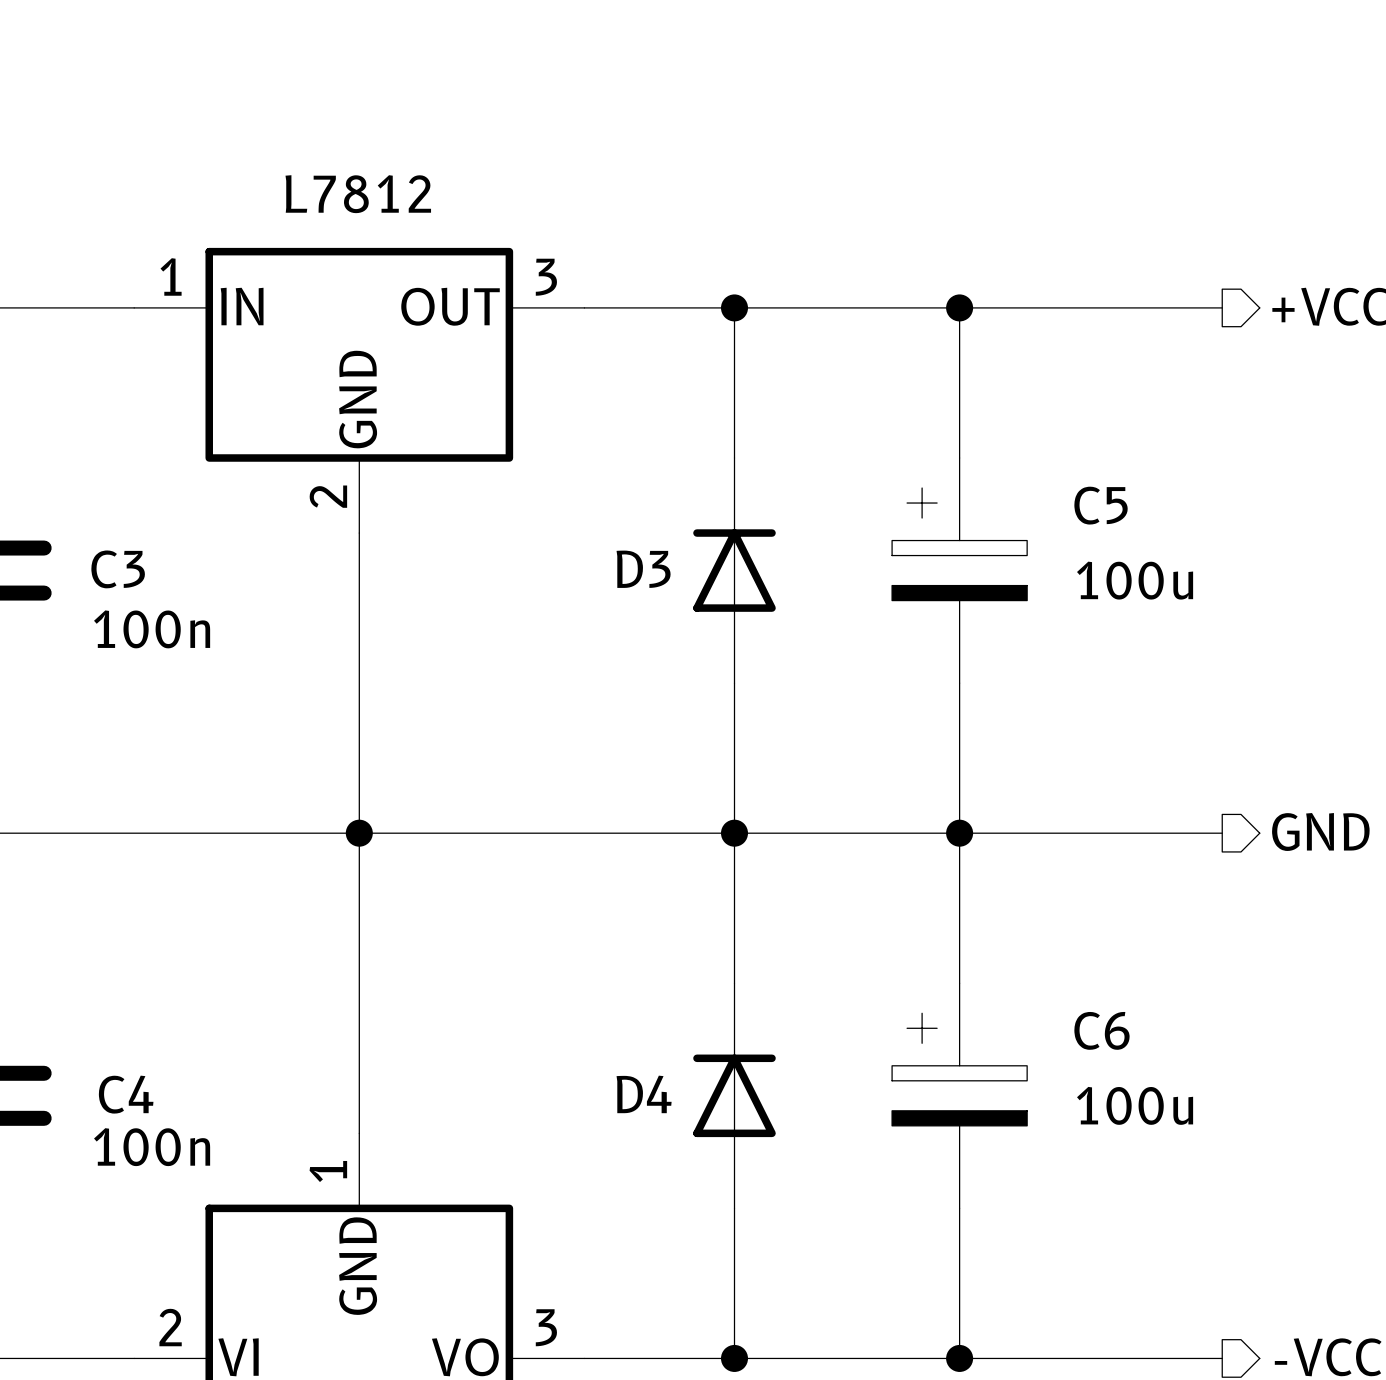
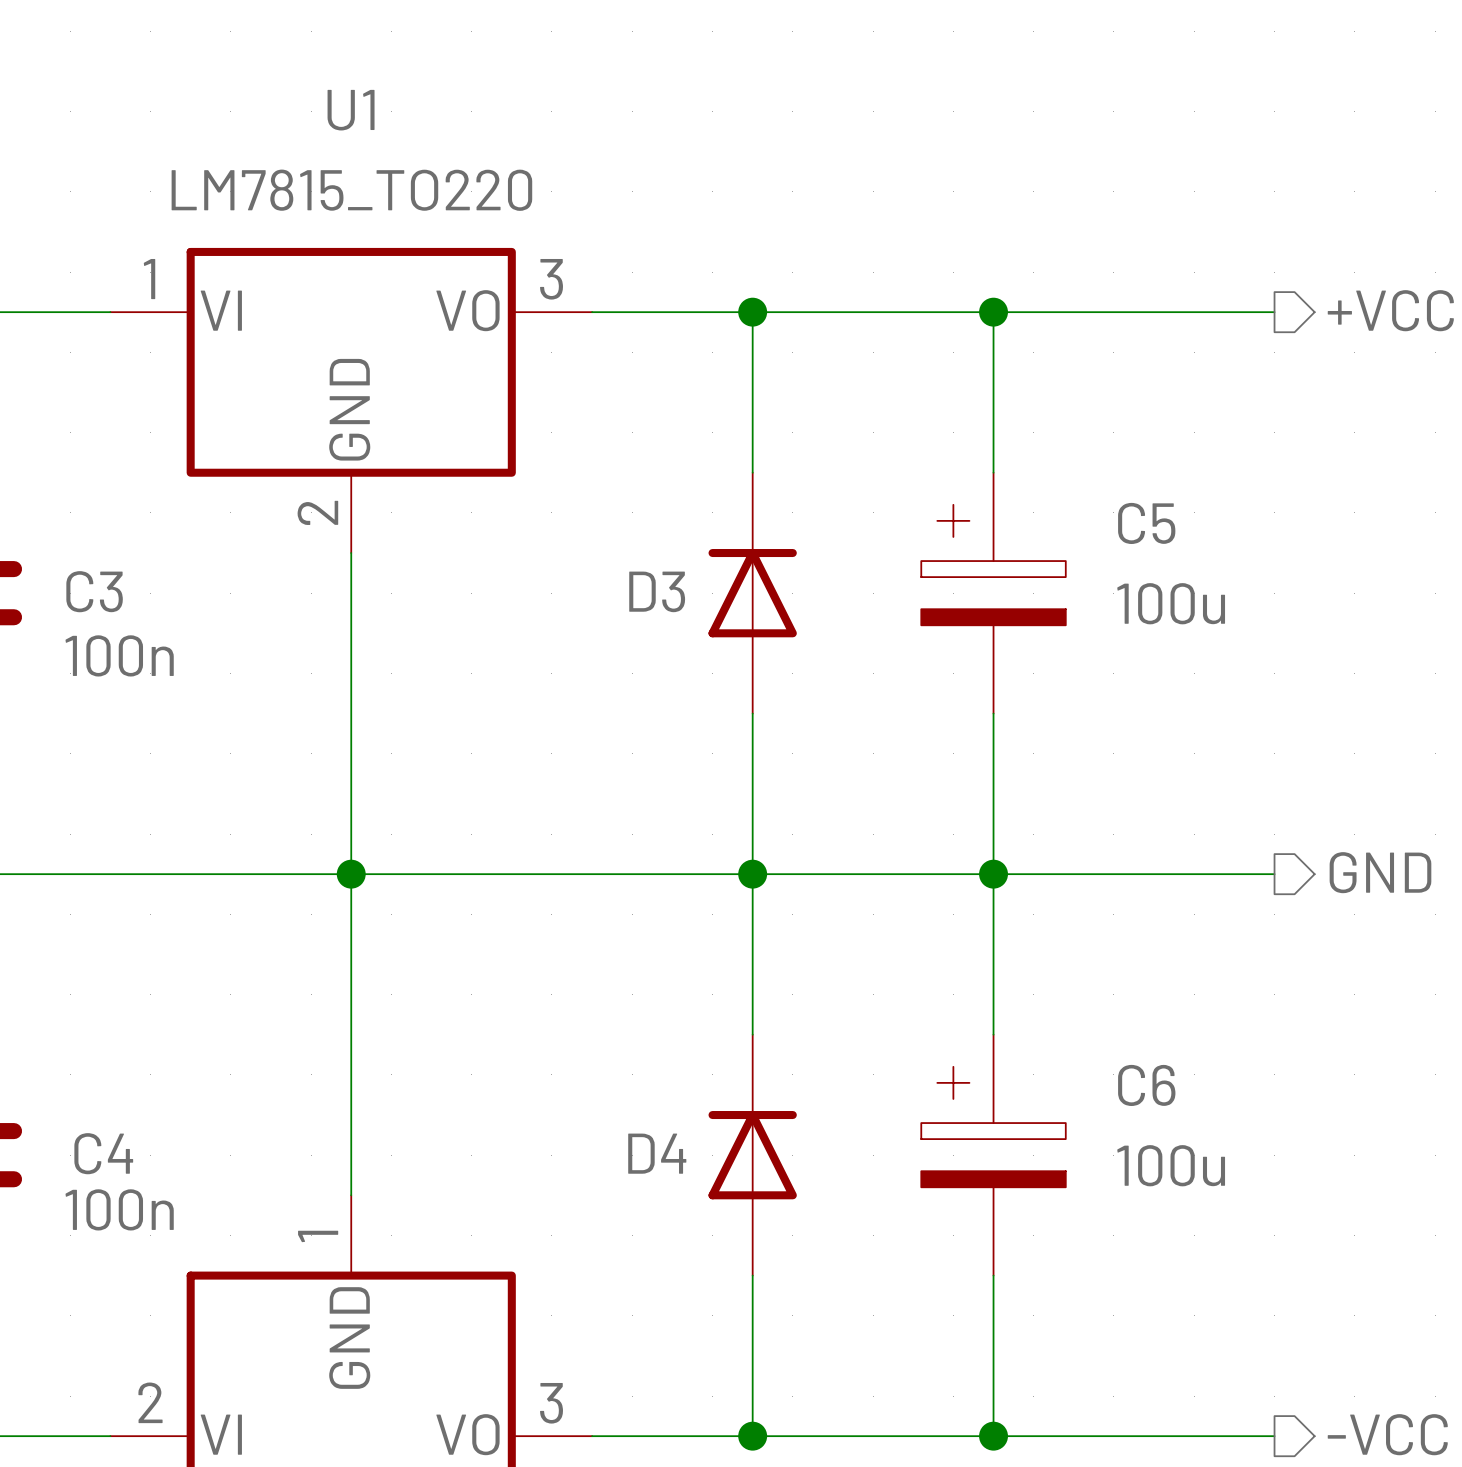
U1 name: none -> U1 (351, 110)
U1 value: L7812 (358, 194) -> LM7815_TO220 (351, 190)
U1 pin name: IN (242, 306) -> VI (221, 310)
U1 pin name: OUT (450, 306) -> VO (467, 310)

